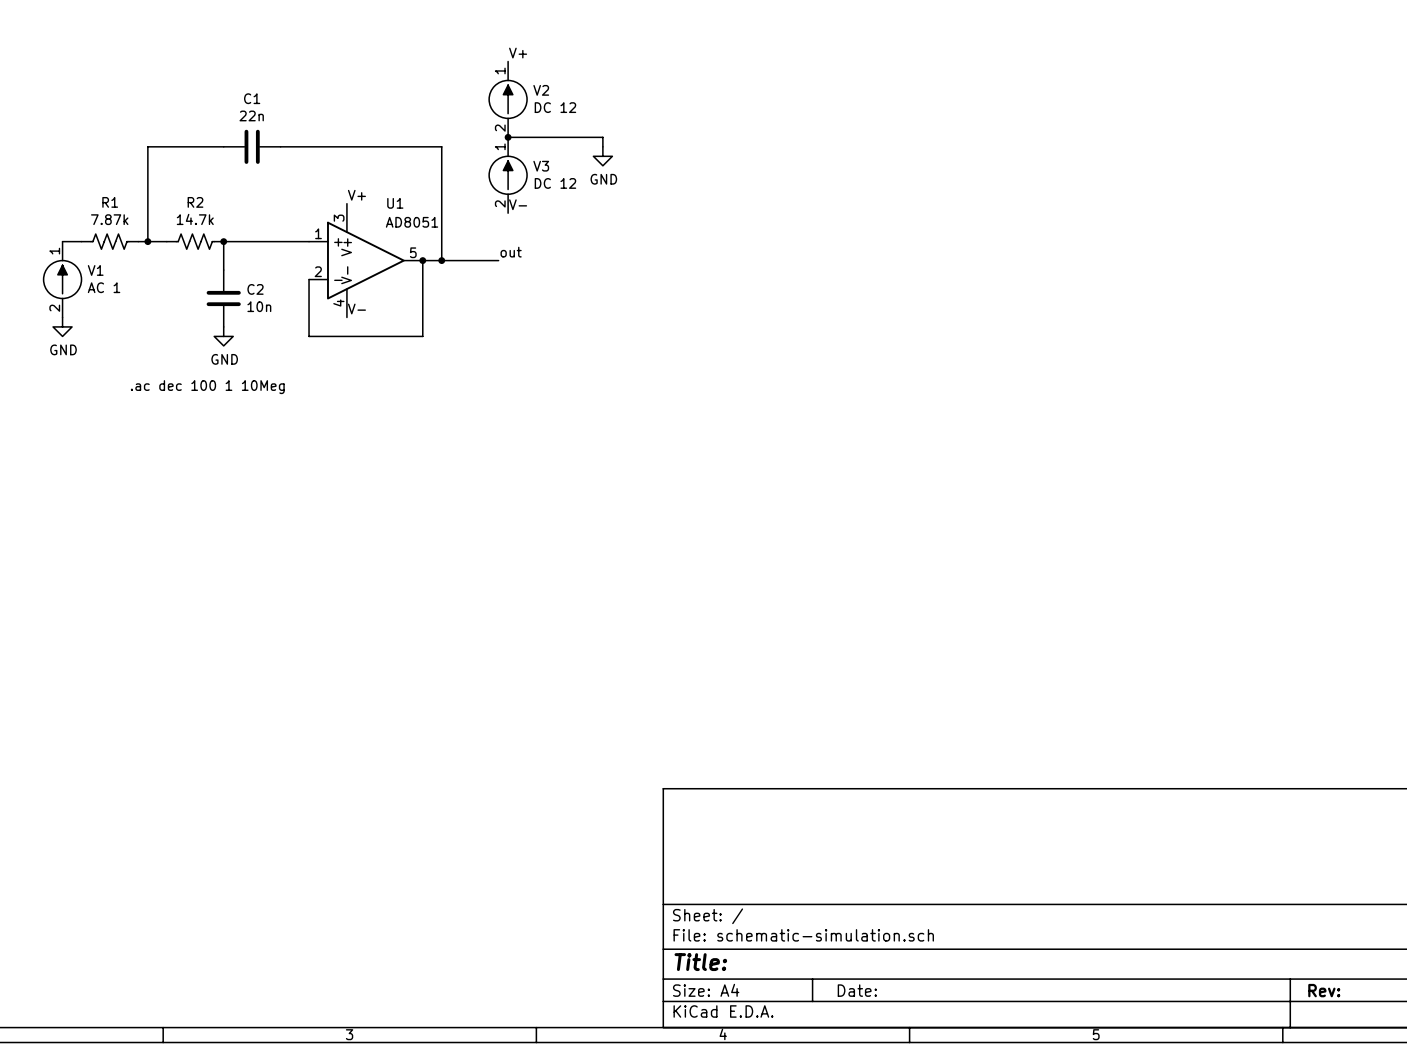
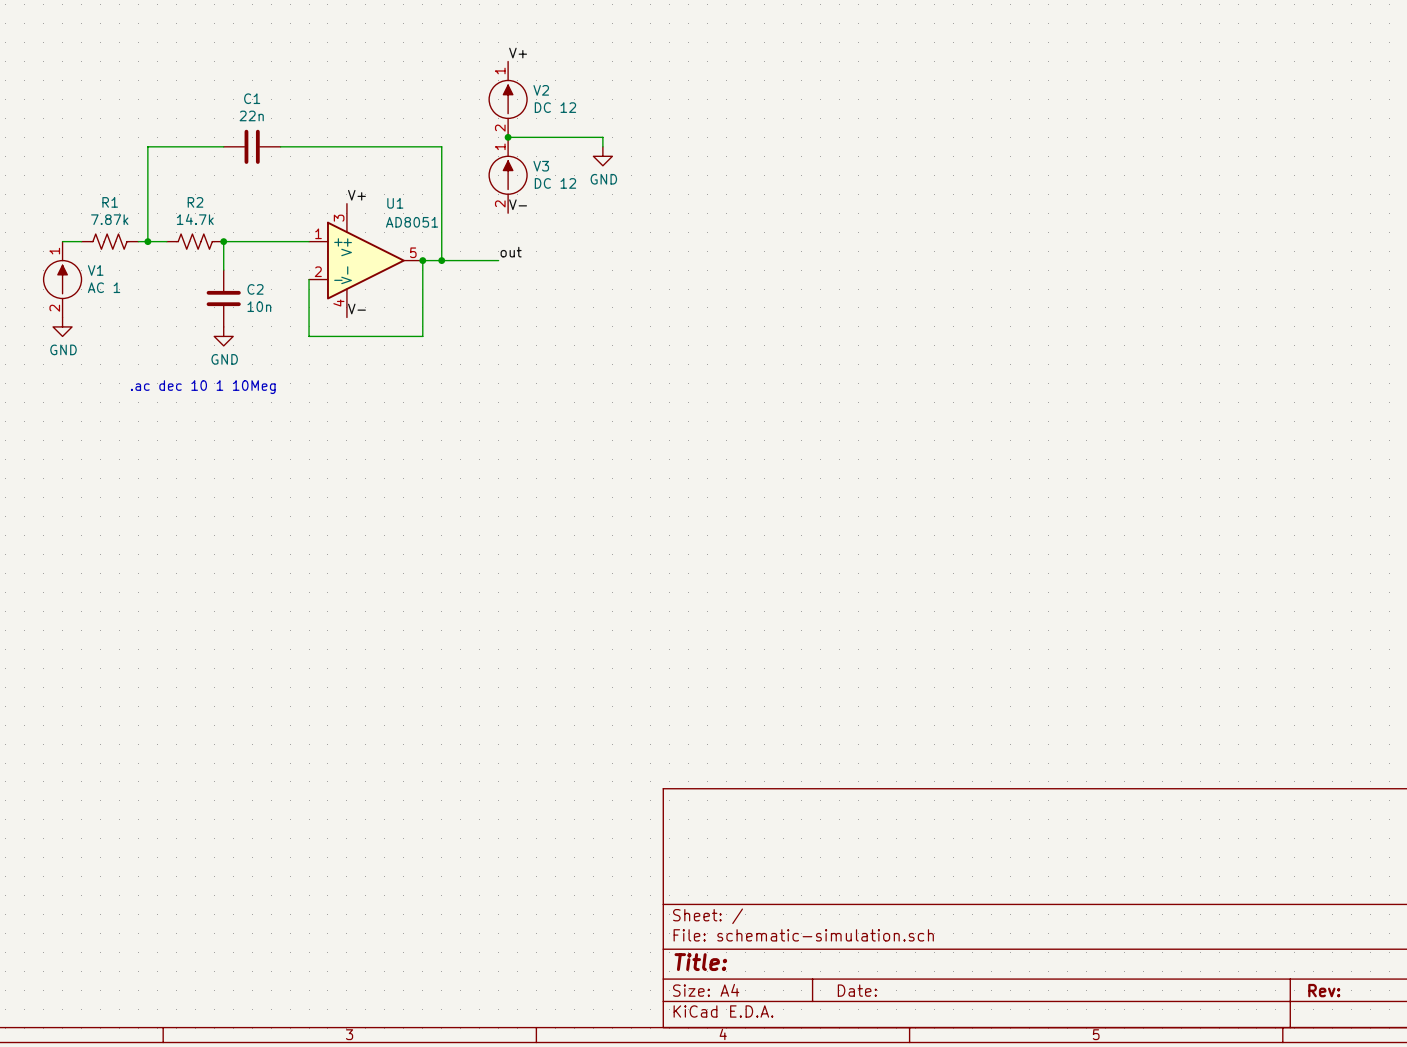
text: .ac dec 100 1 10Meg (207, 387) -> .ac dec 10 1 10Meg (203, 387)

